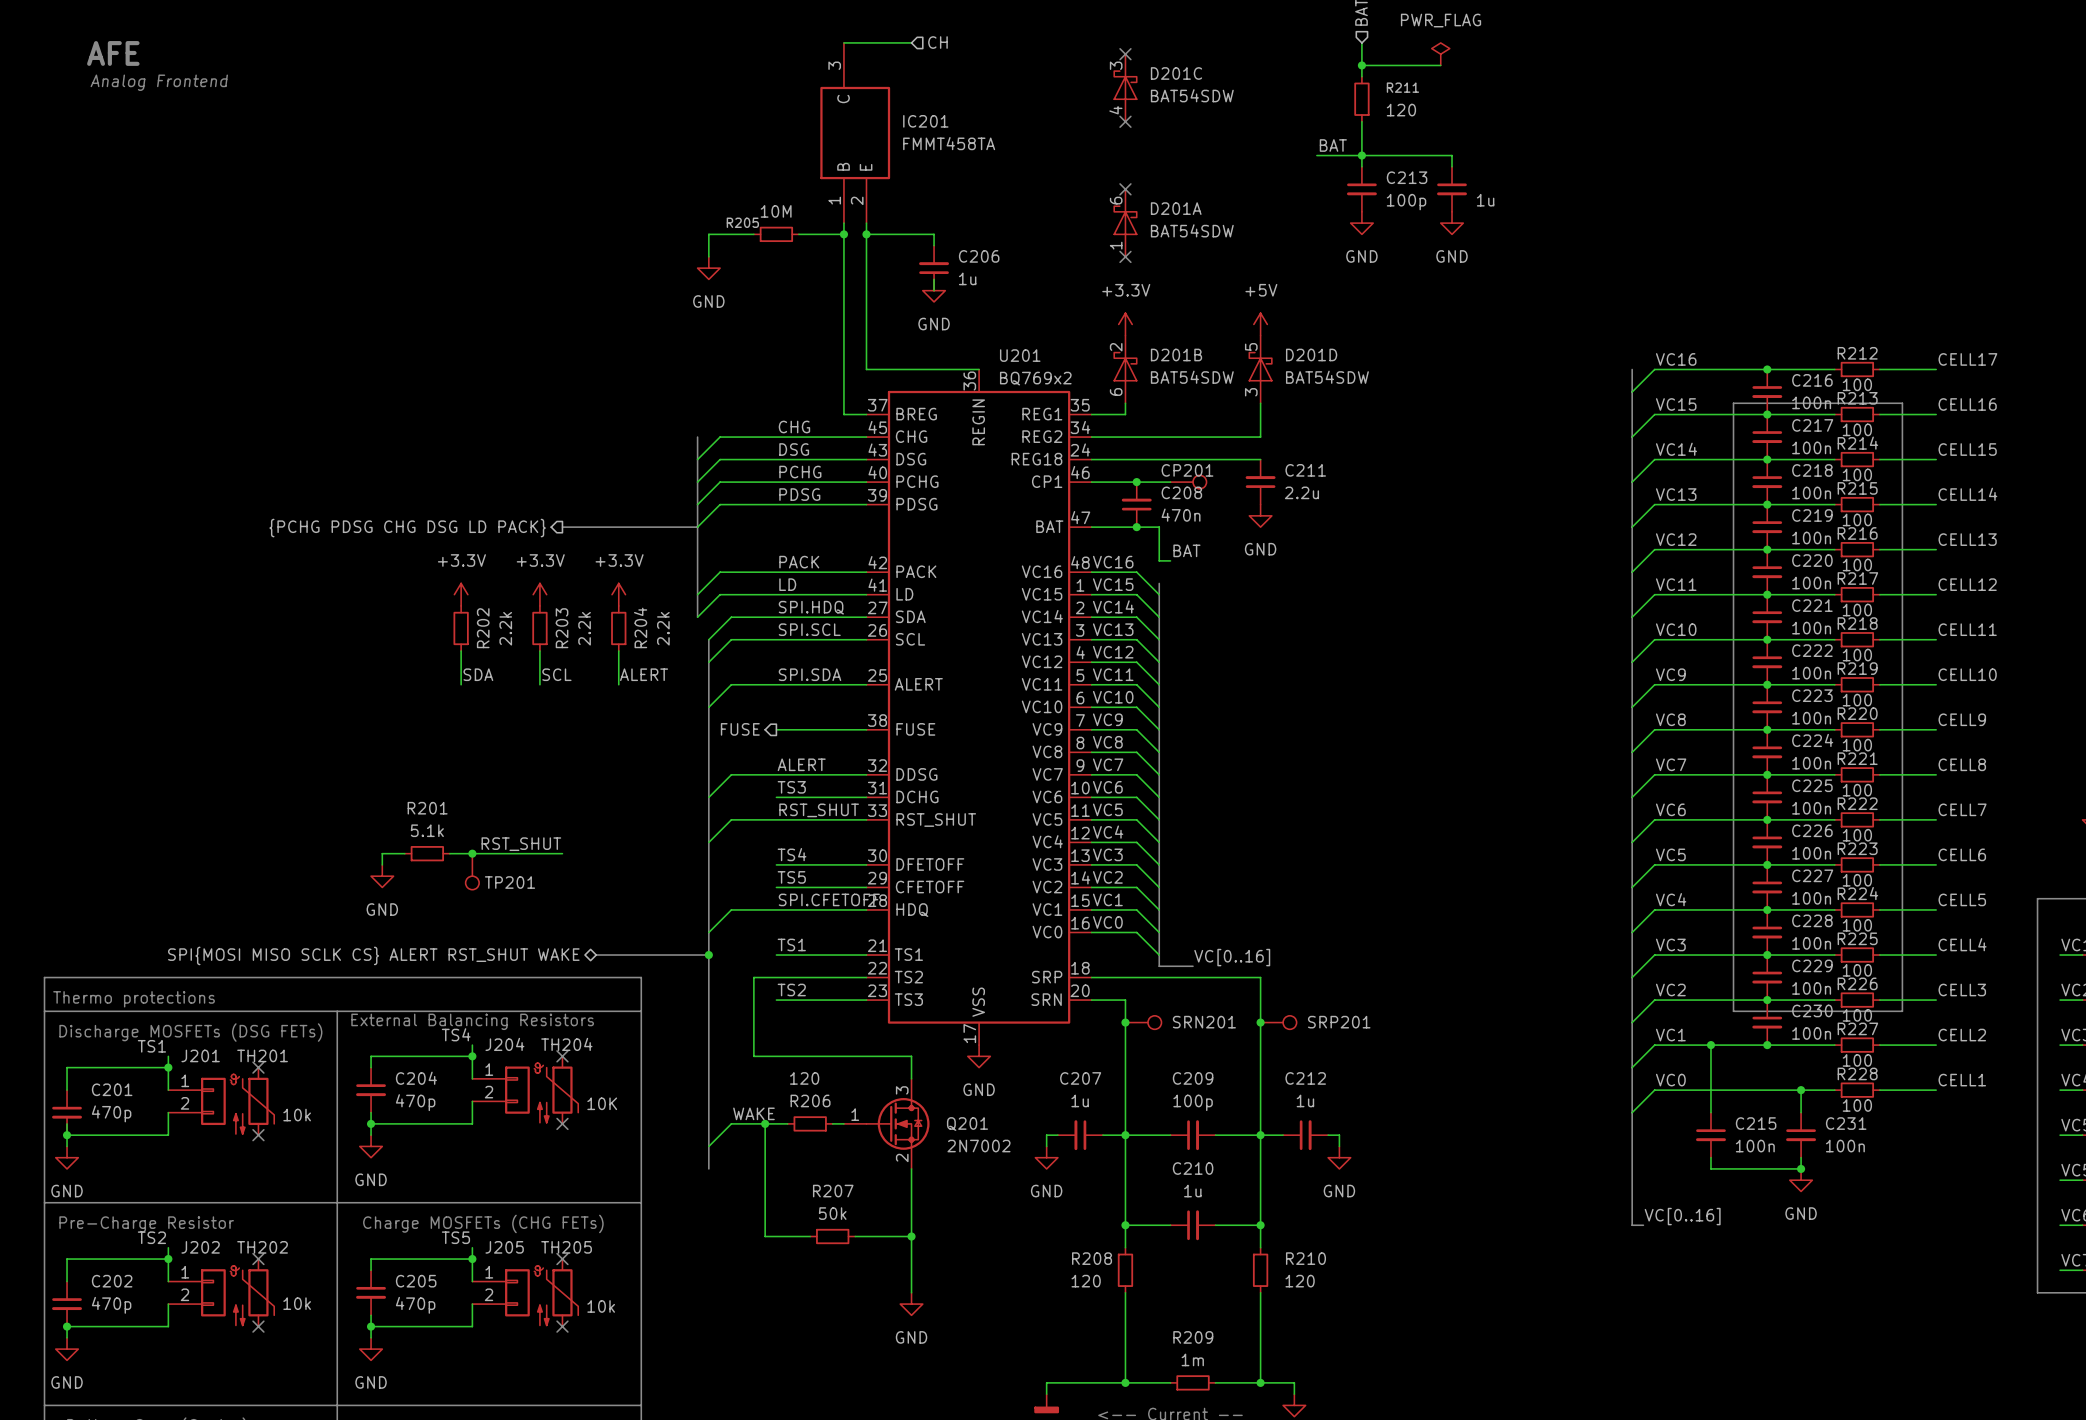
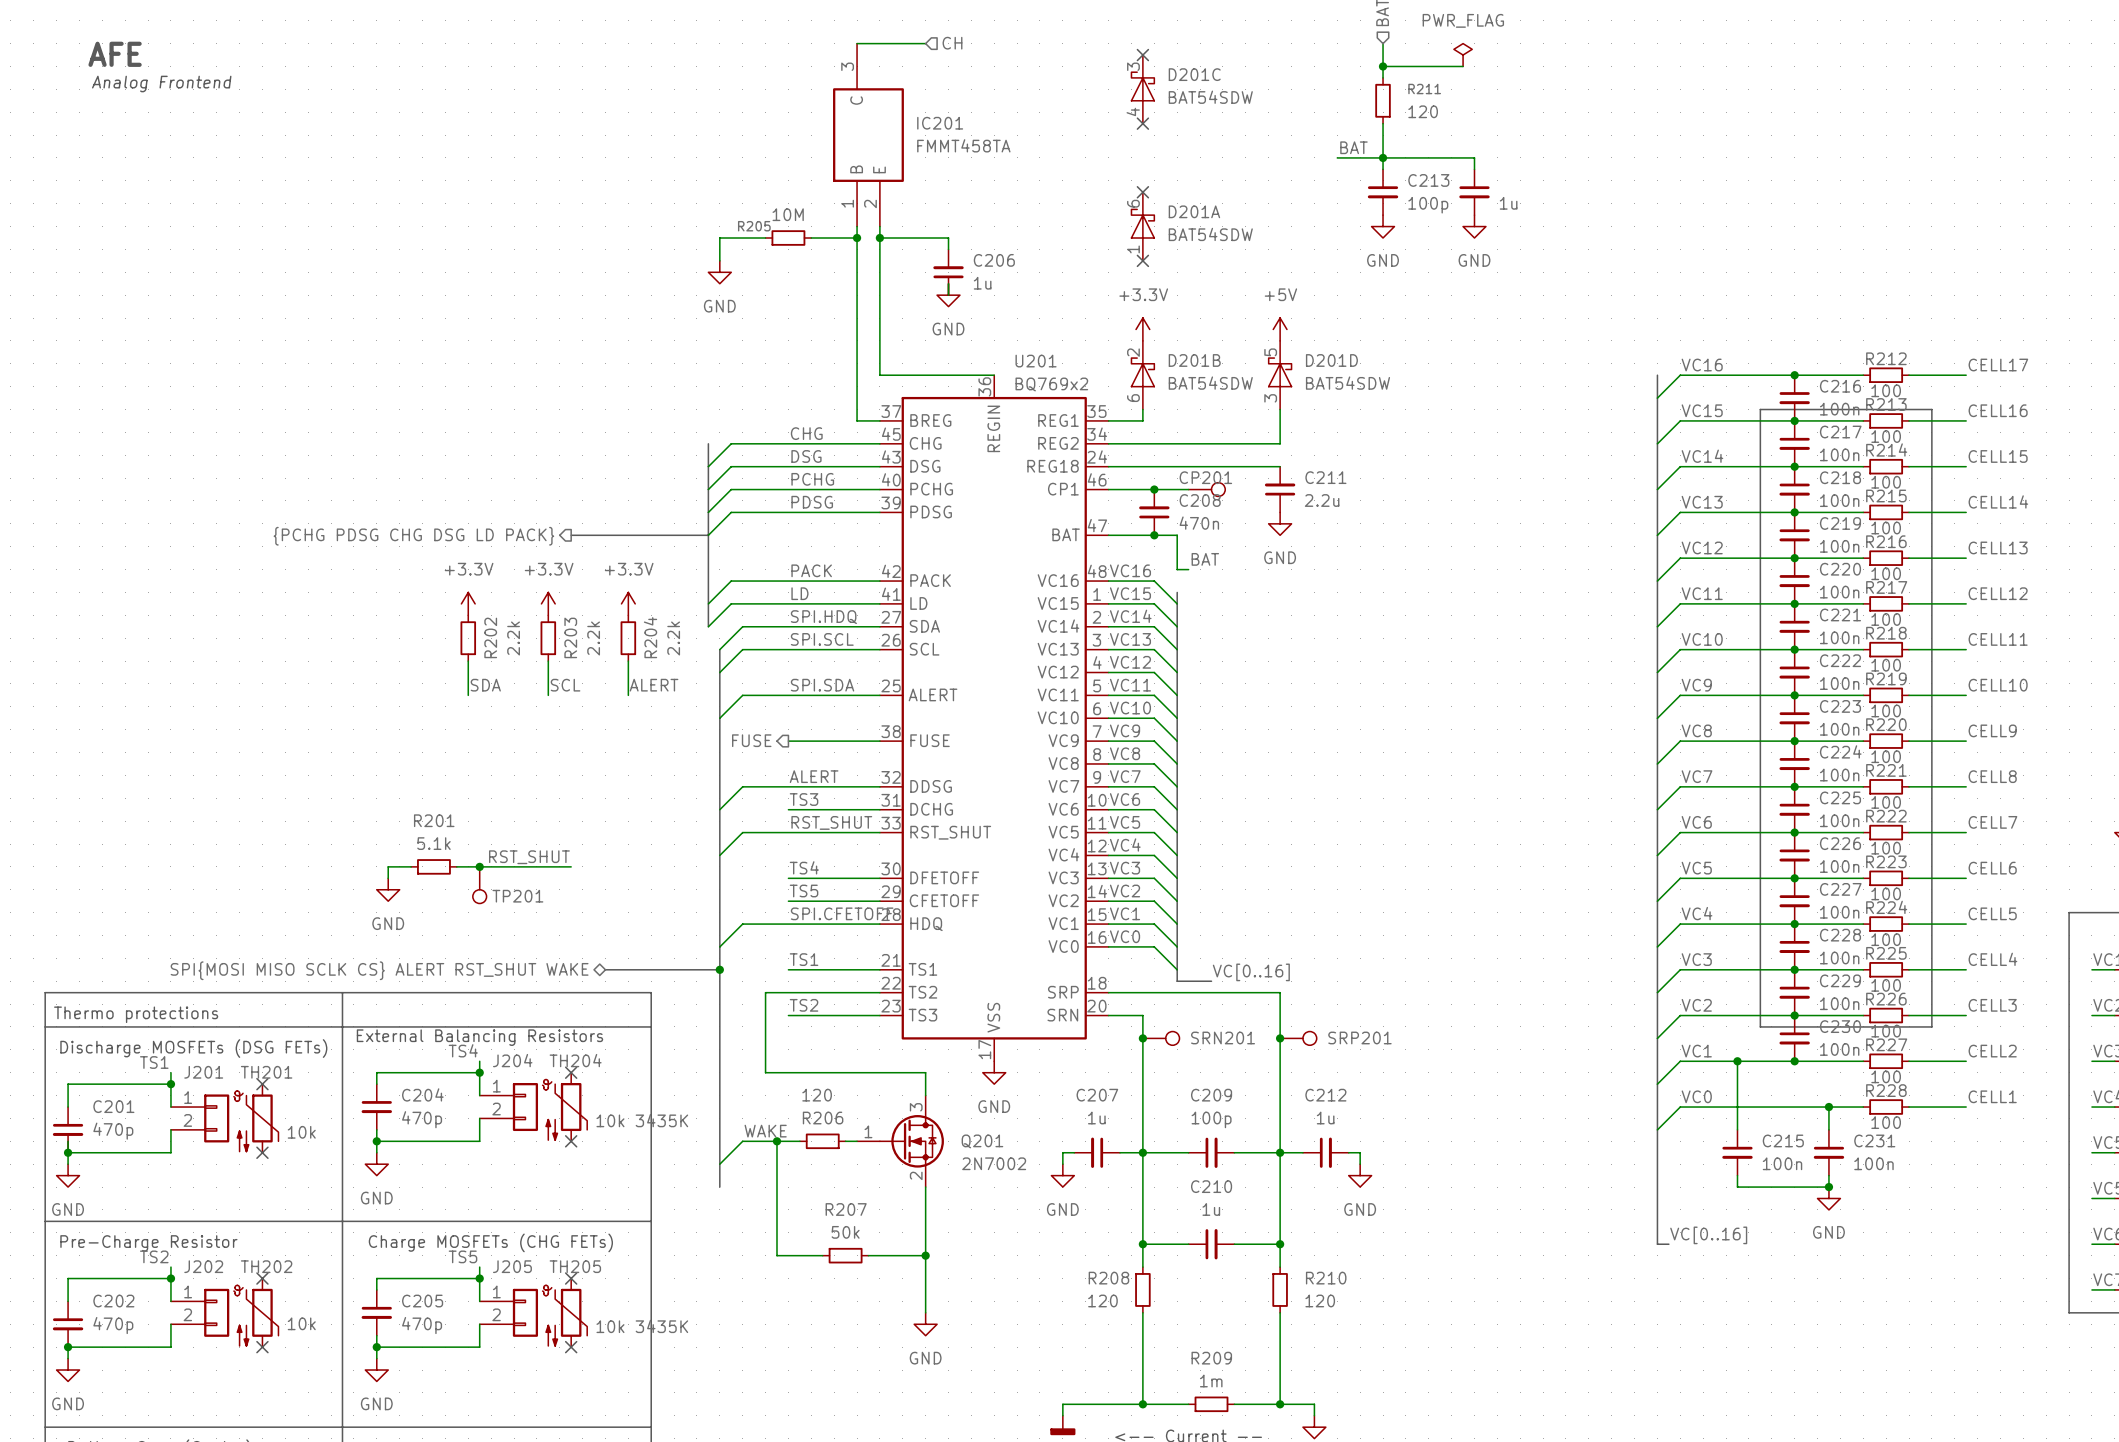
line: none -> (342, 992) (342, 1026)
TH204 value: 10K (602, 1103) -> 10k 3435K (642, 1120)
TH205 value: 10k (601, 1306) -> 10k 3435K (642, 1326)

